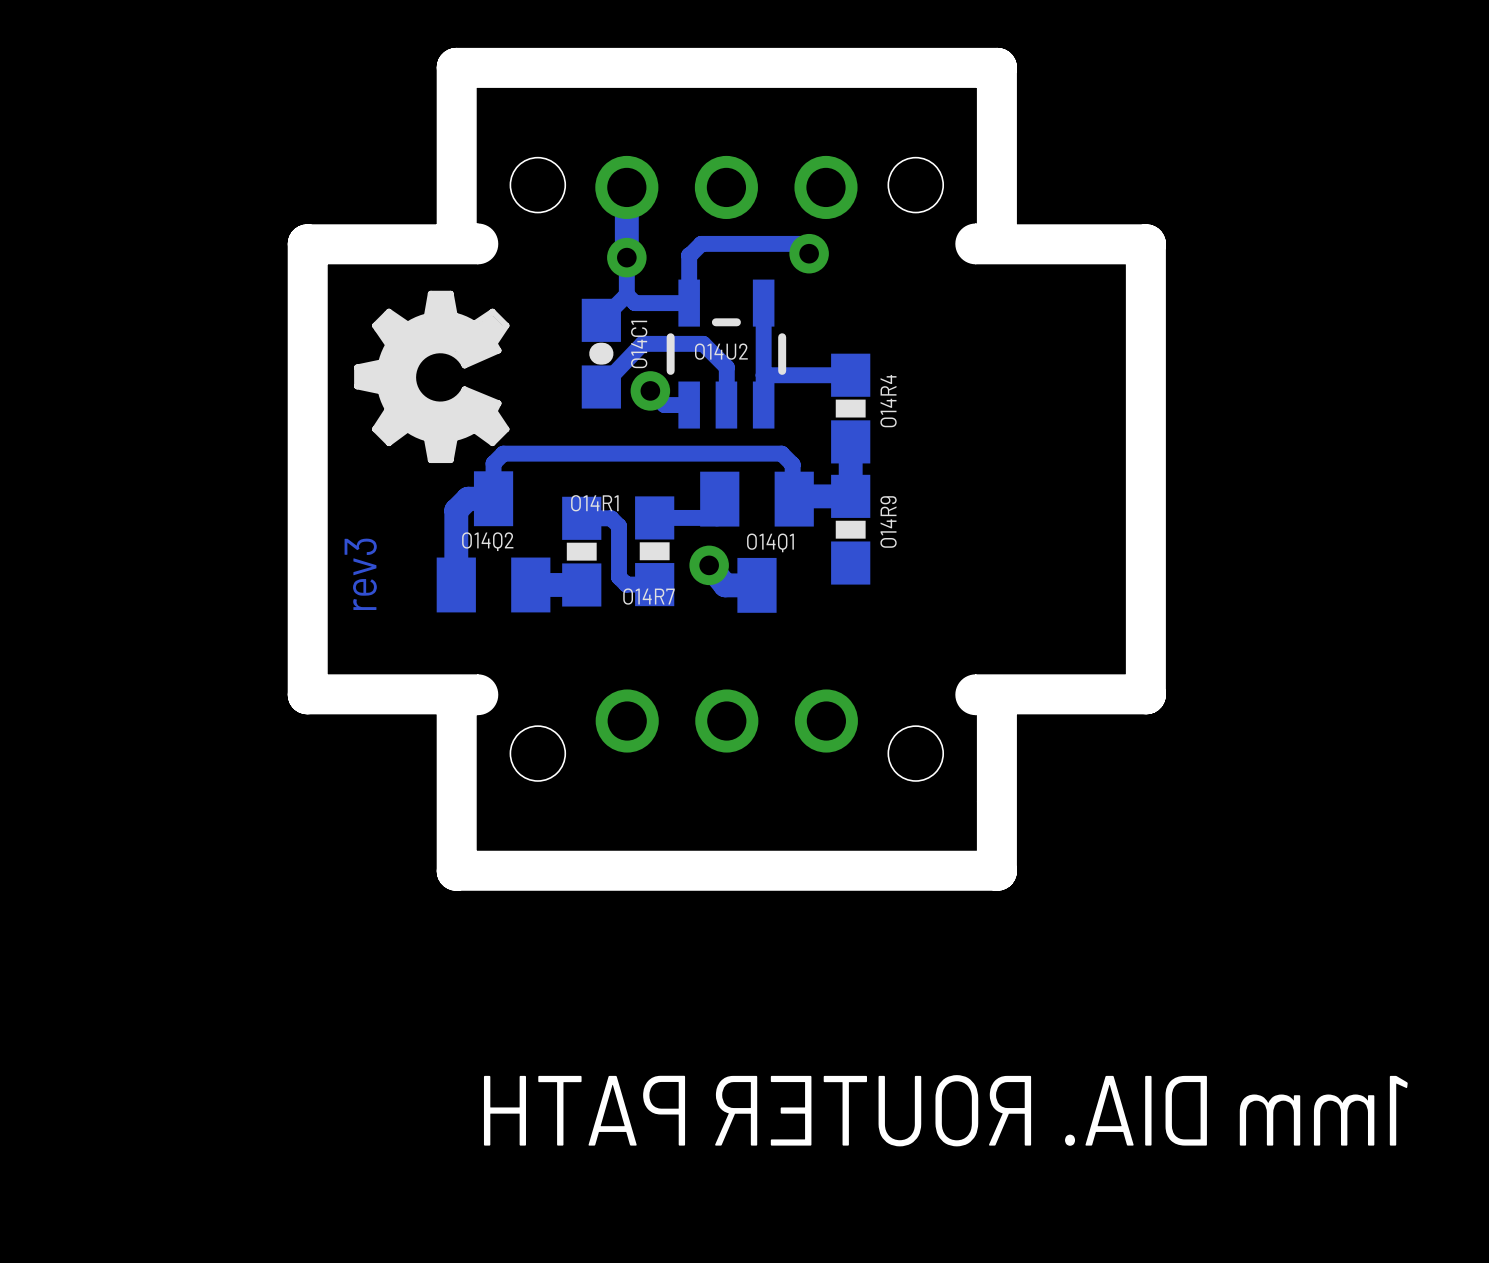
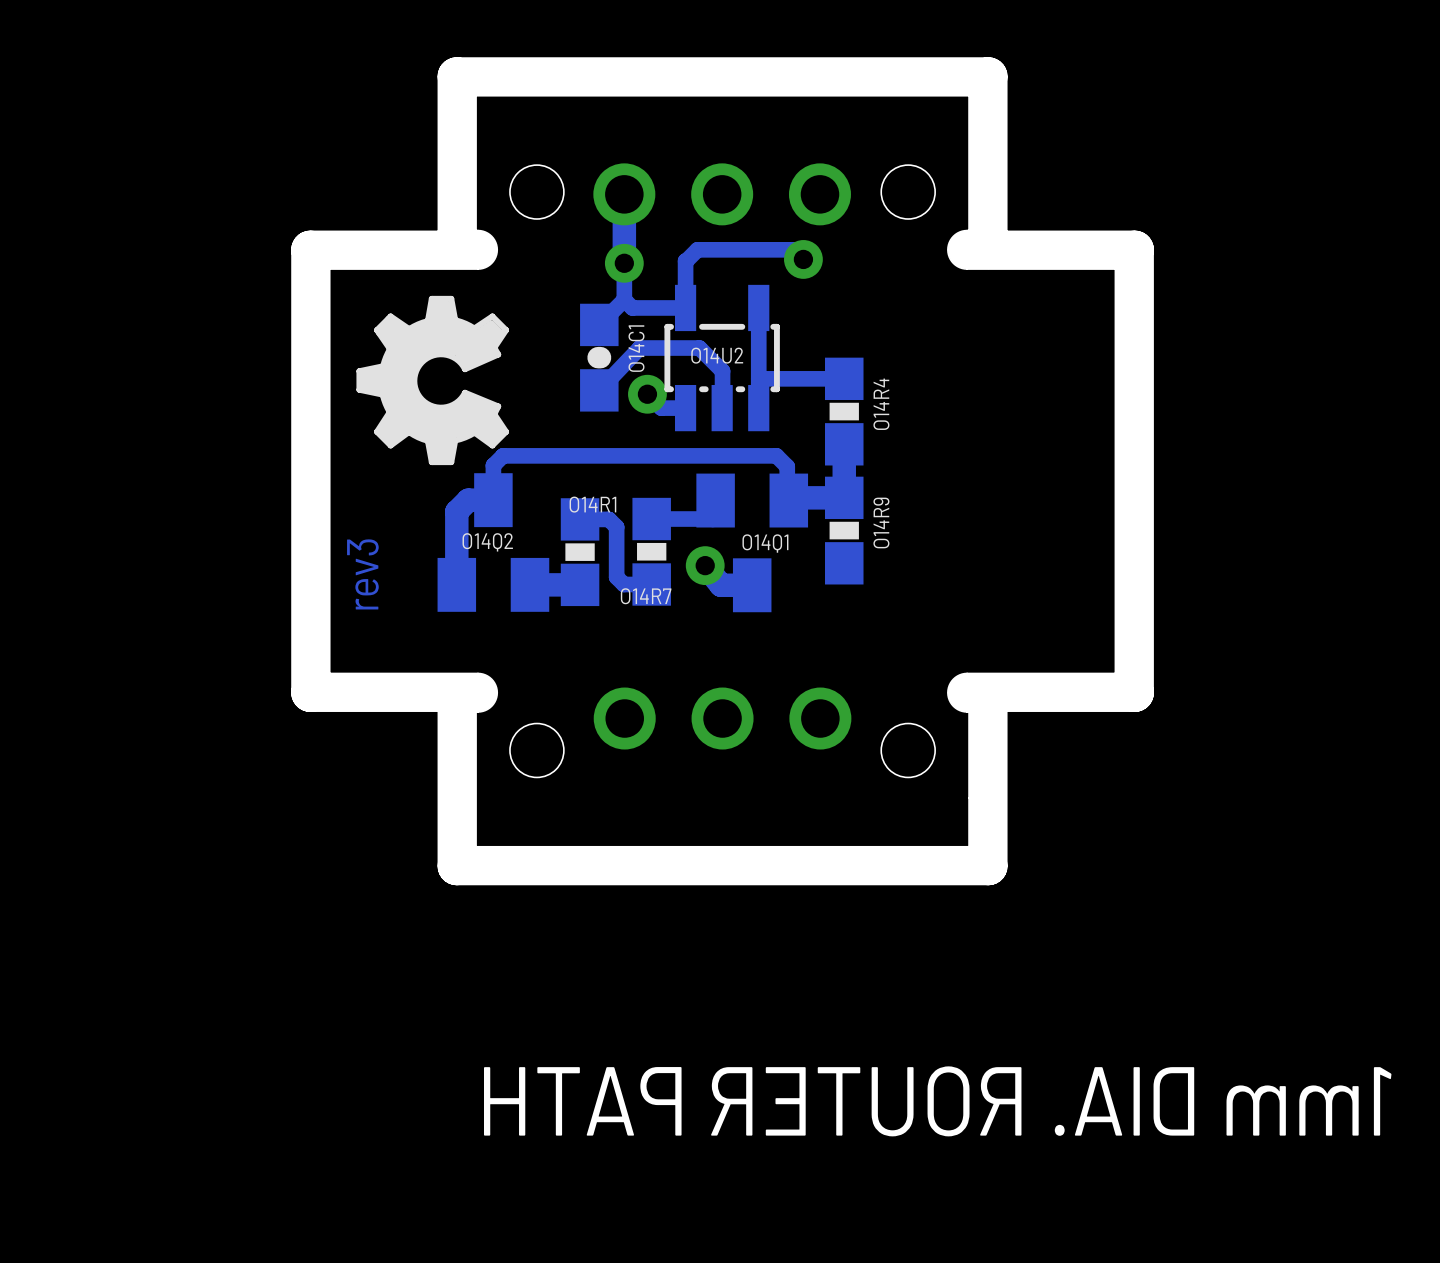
O14U2 footprint: [666, 279, 787, 429] -> [664, 284, 780, 432]

